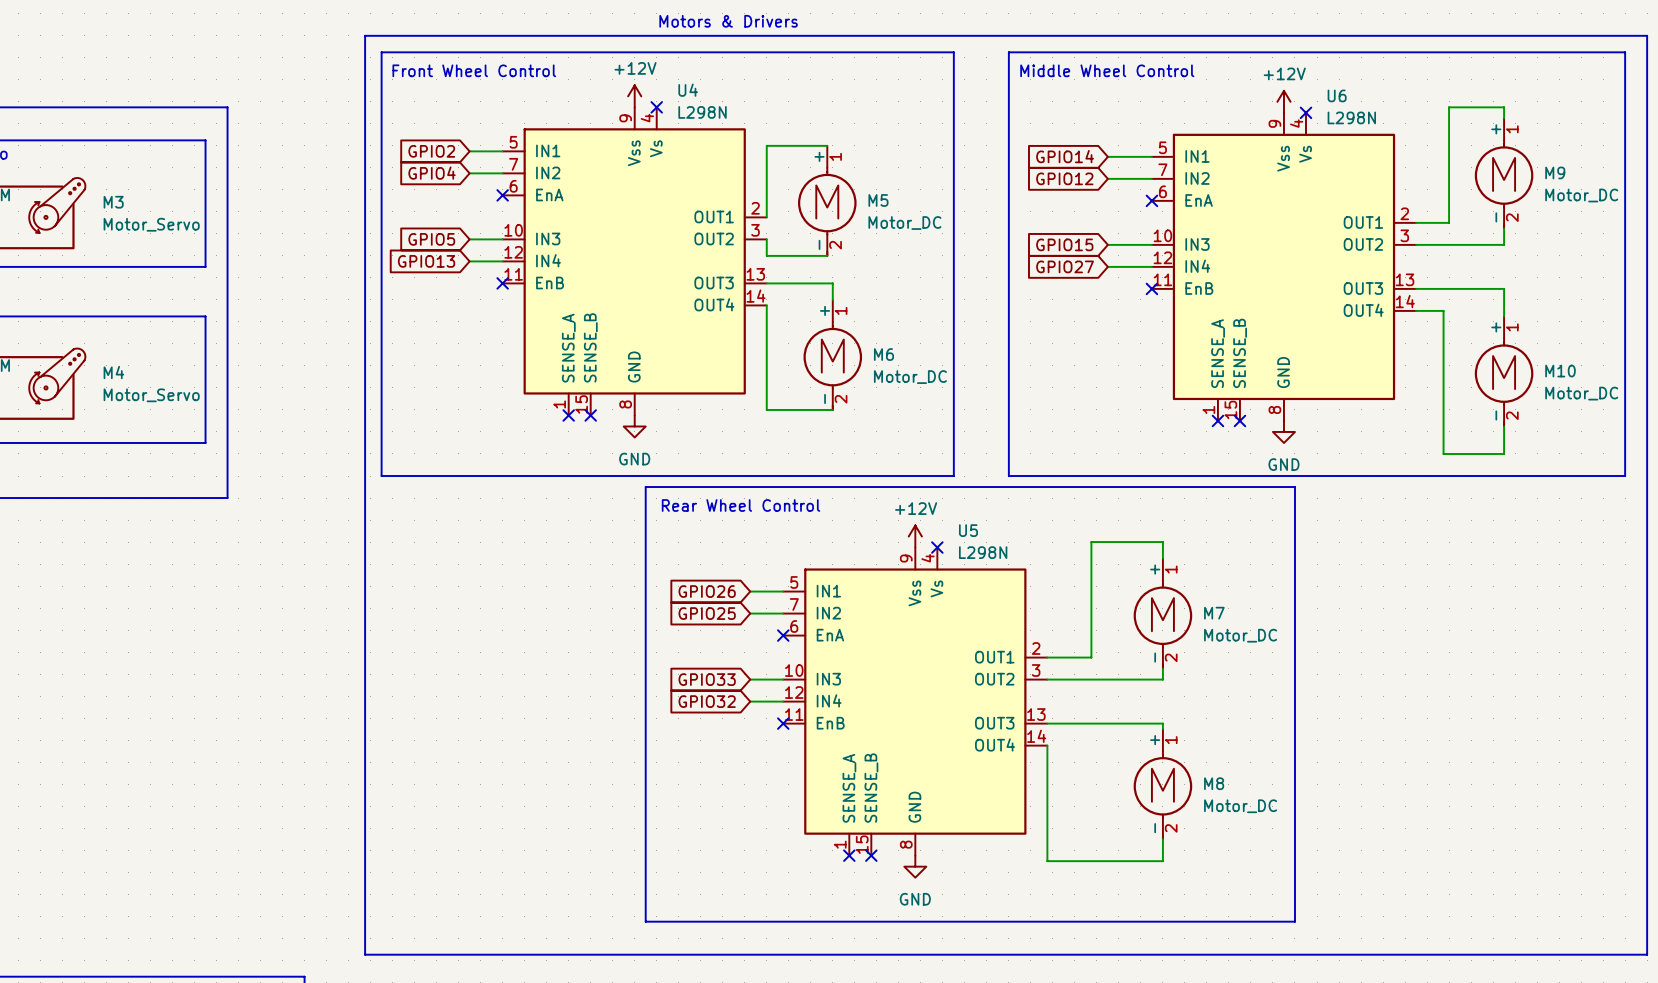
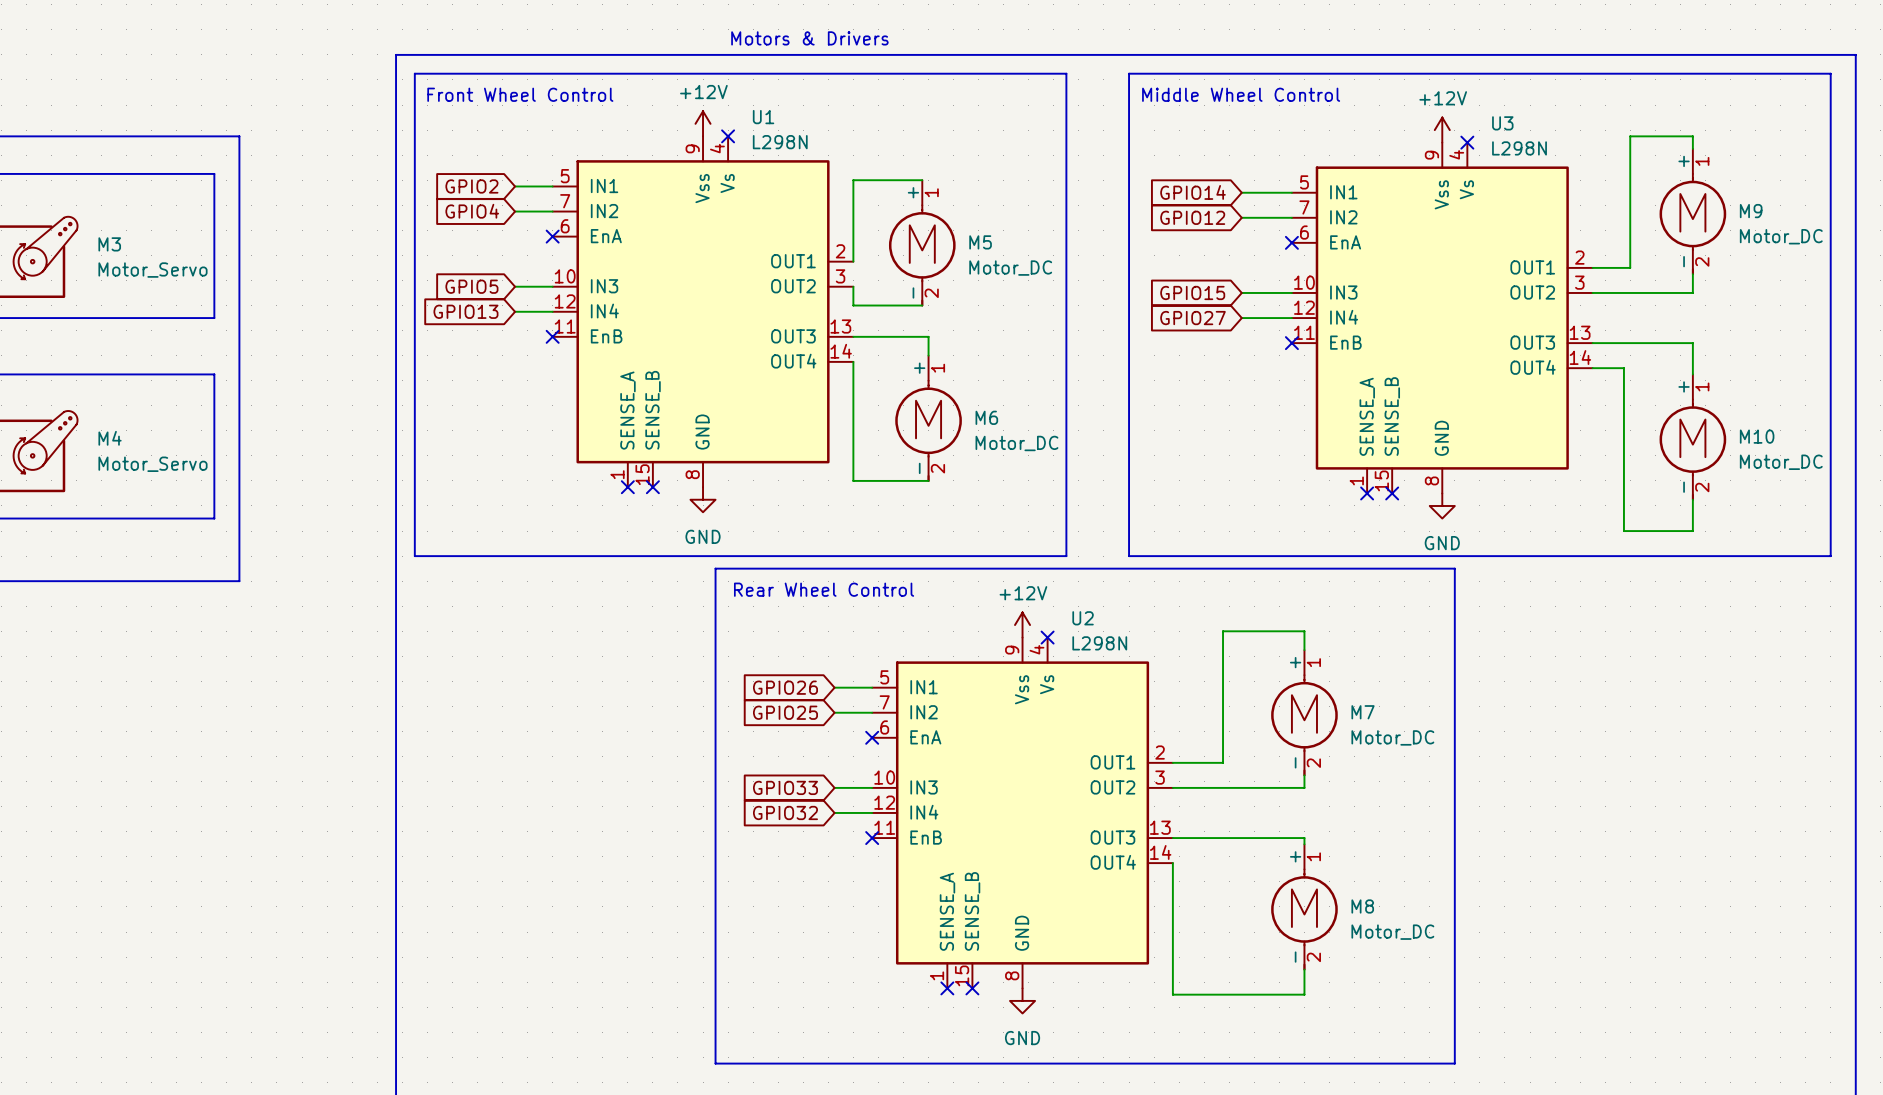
U4 name: U4 (688, 90) -> U1 (763, 117)
U6 name: U6 (1337, 95) -> U3 (1502, 123)
U5 name: U5 (968, 530) -> U2 (1083, 618)

